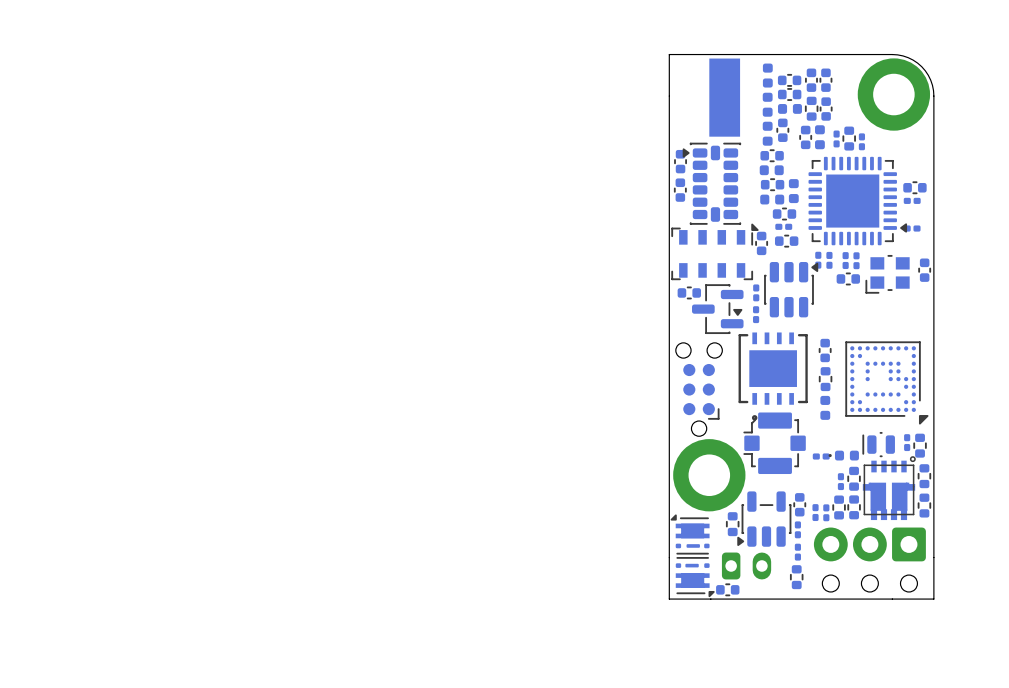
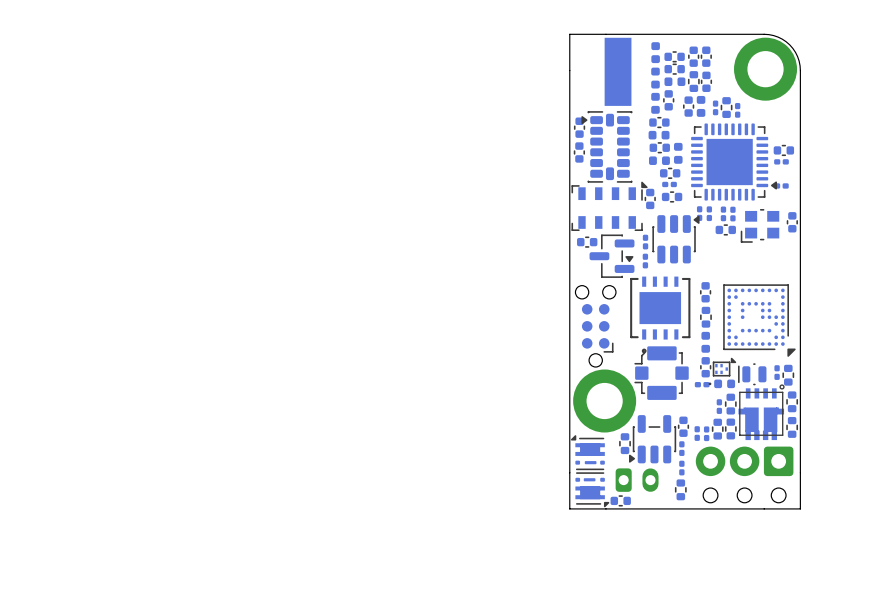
part: none -> (705, 367)
part: none -> (724, 367)

